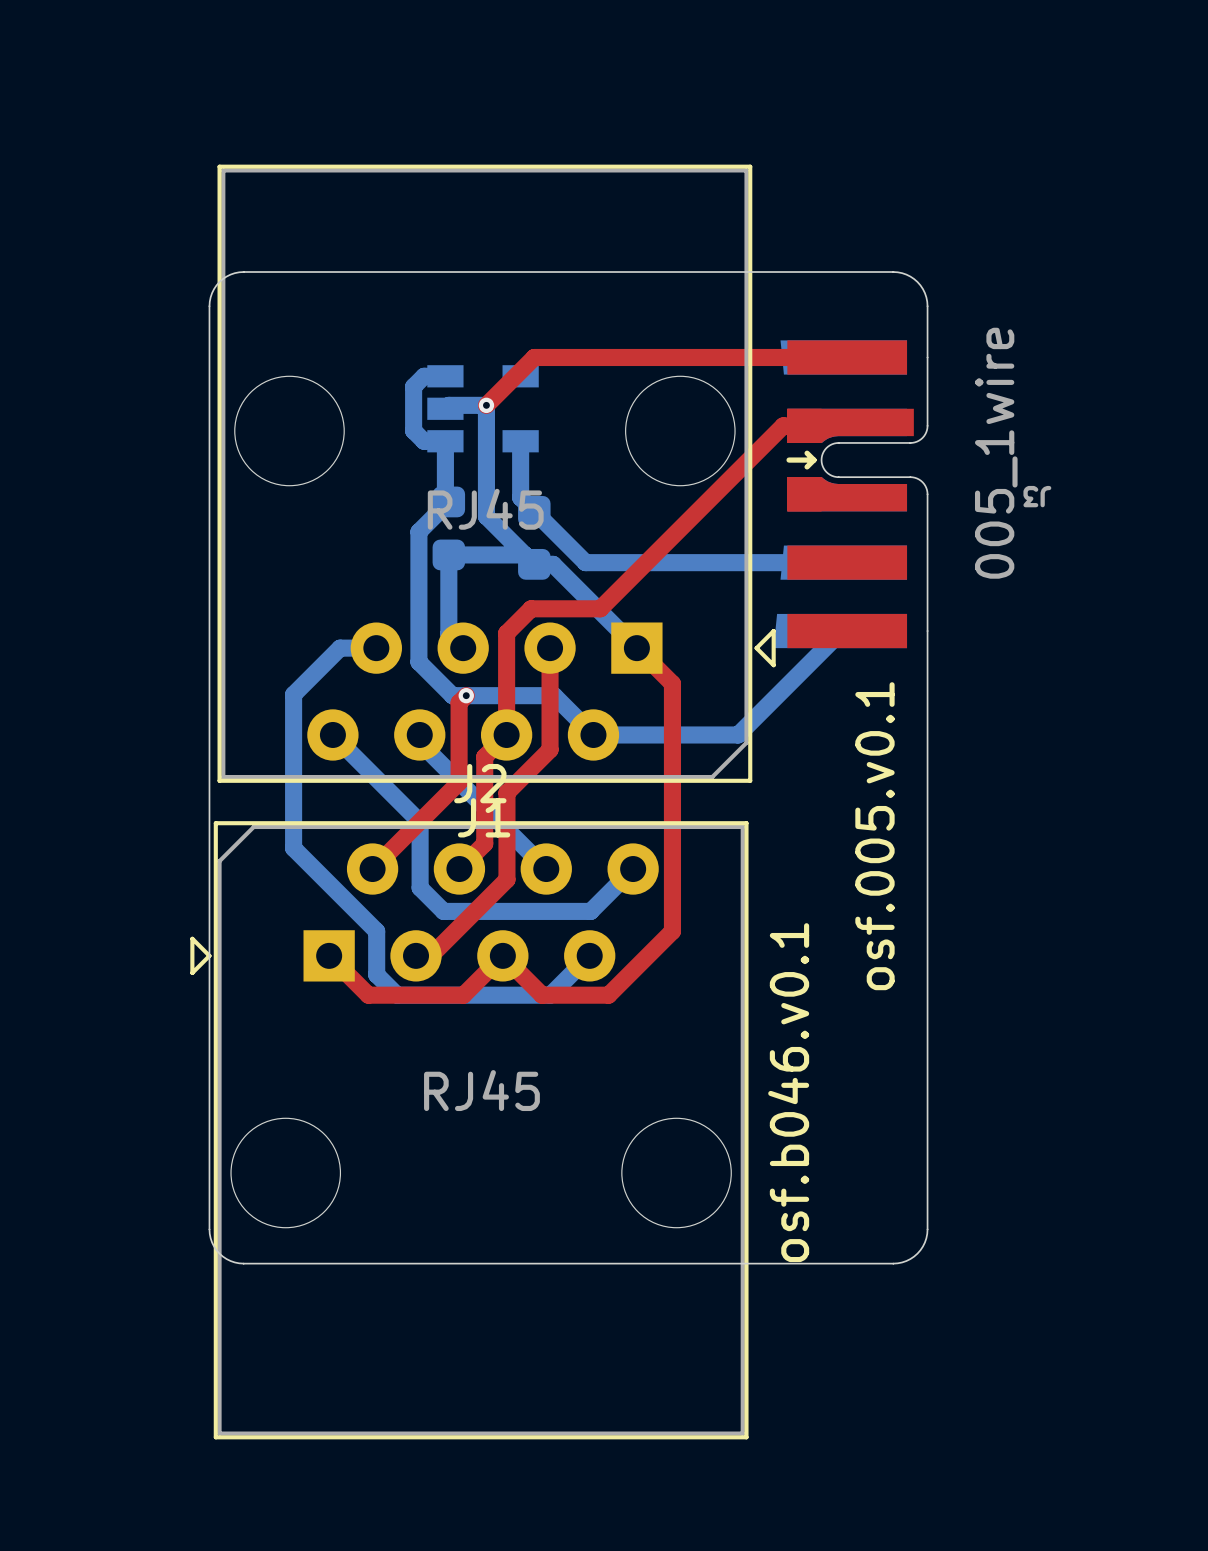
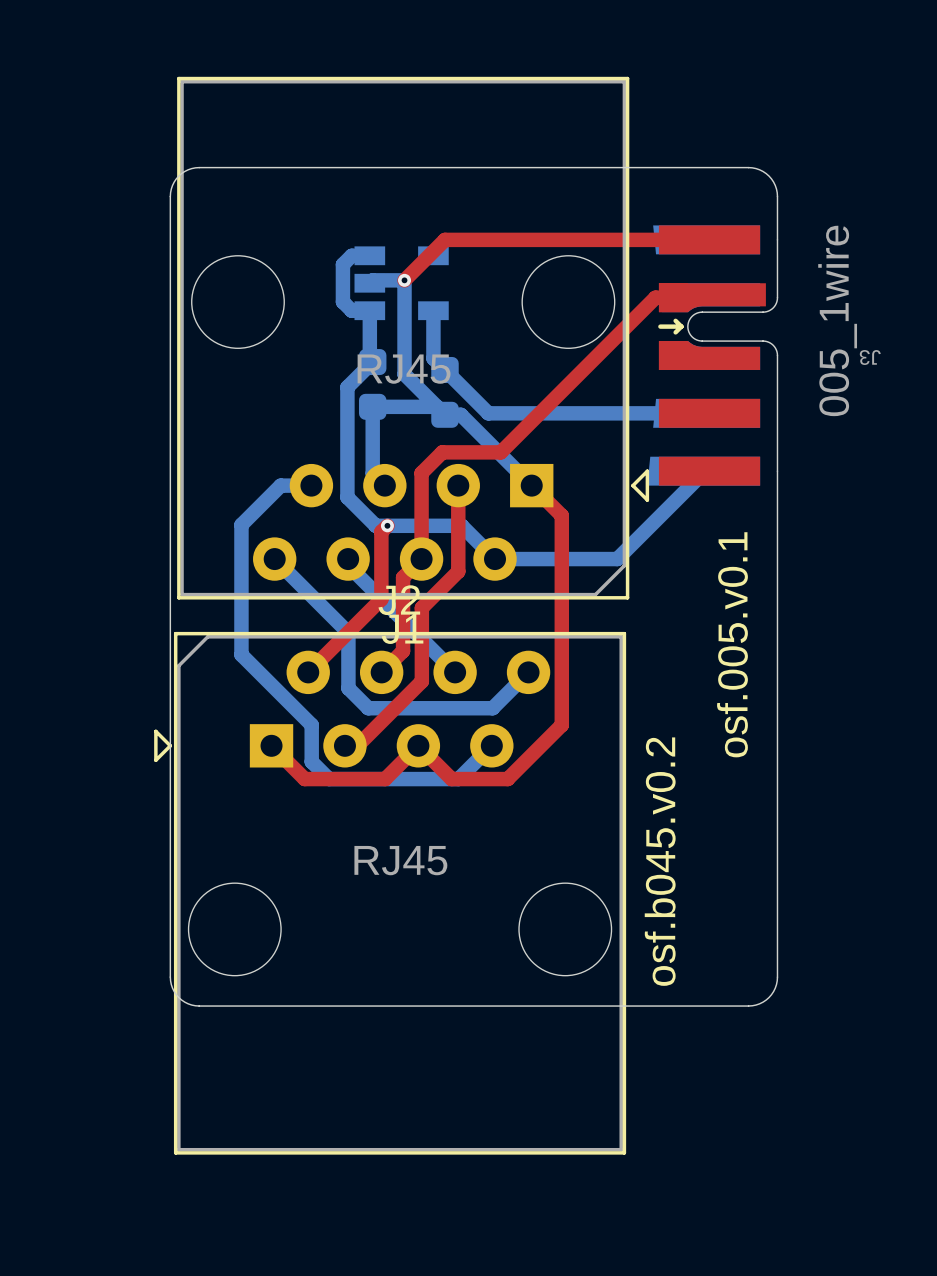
text: osf.b046.v0.1 (788, 1092) -> osf.b045.v0.2 (660, 861)

